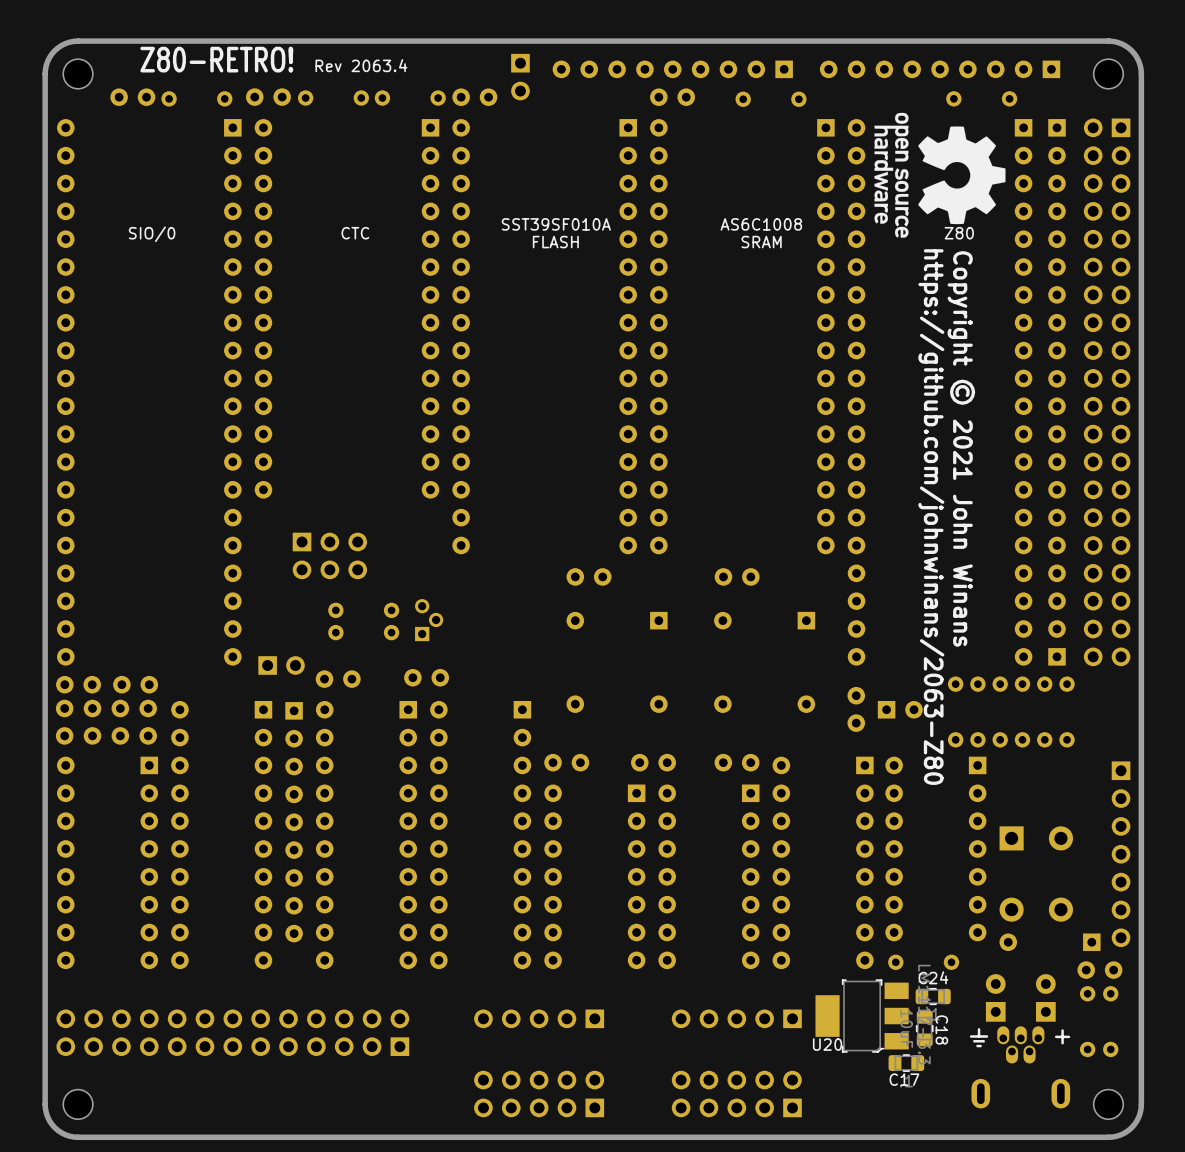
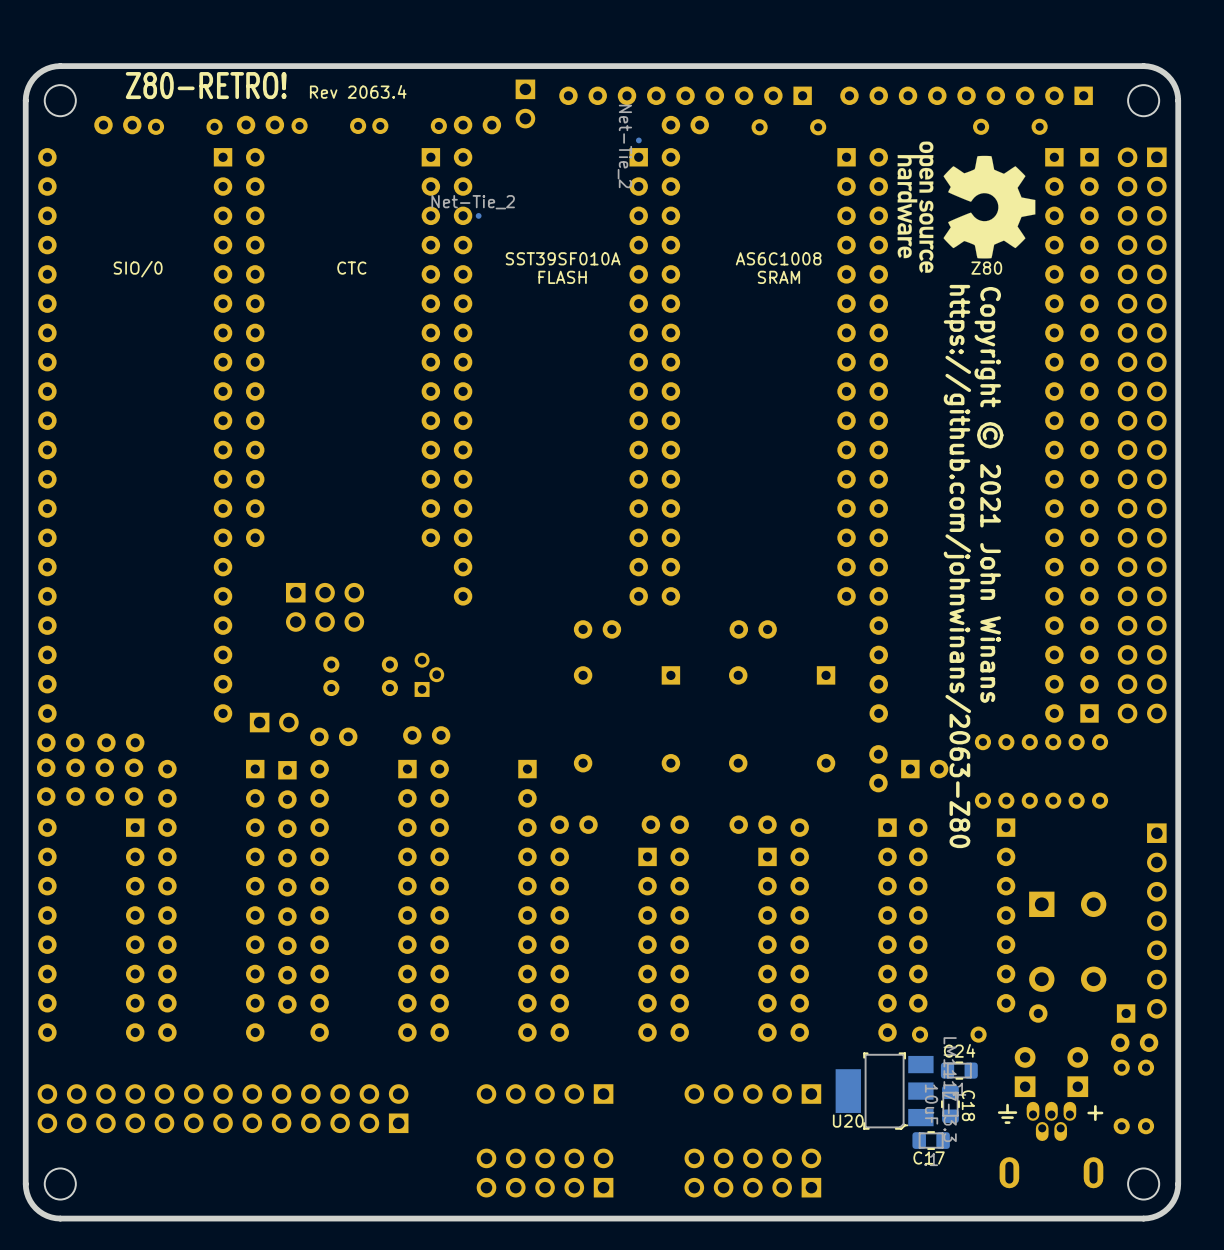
part: none -> Net-Tie_2 (638, 146)
part: none -> Net-Tie_2 (472, 215)

